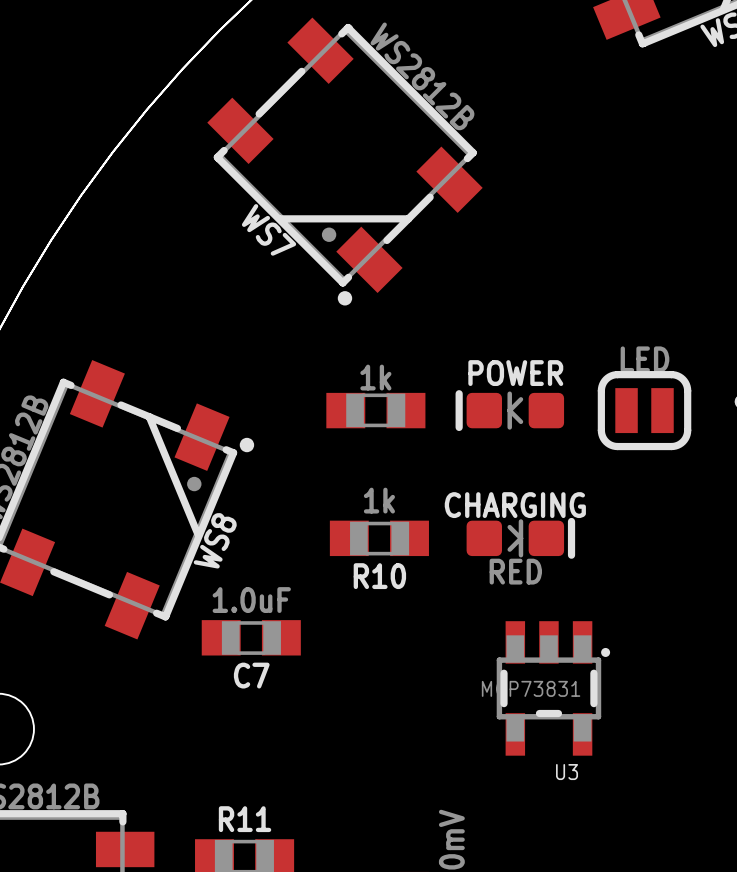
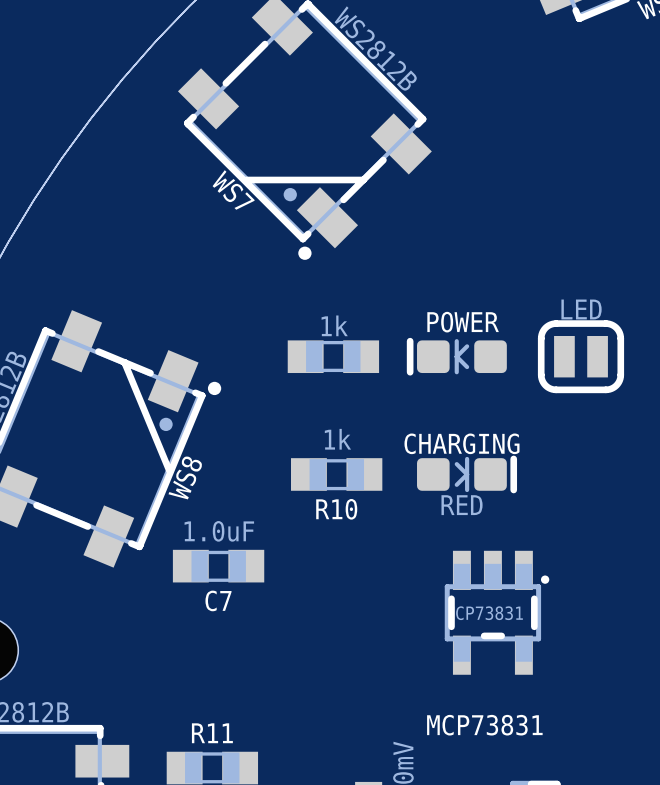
U3 name: U3 (567, 772) -> none
text: none -> MCP73831 (484, 725)

